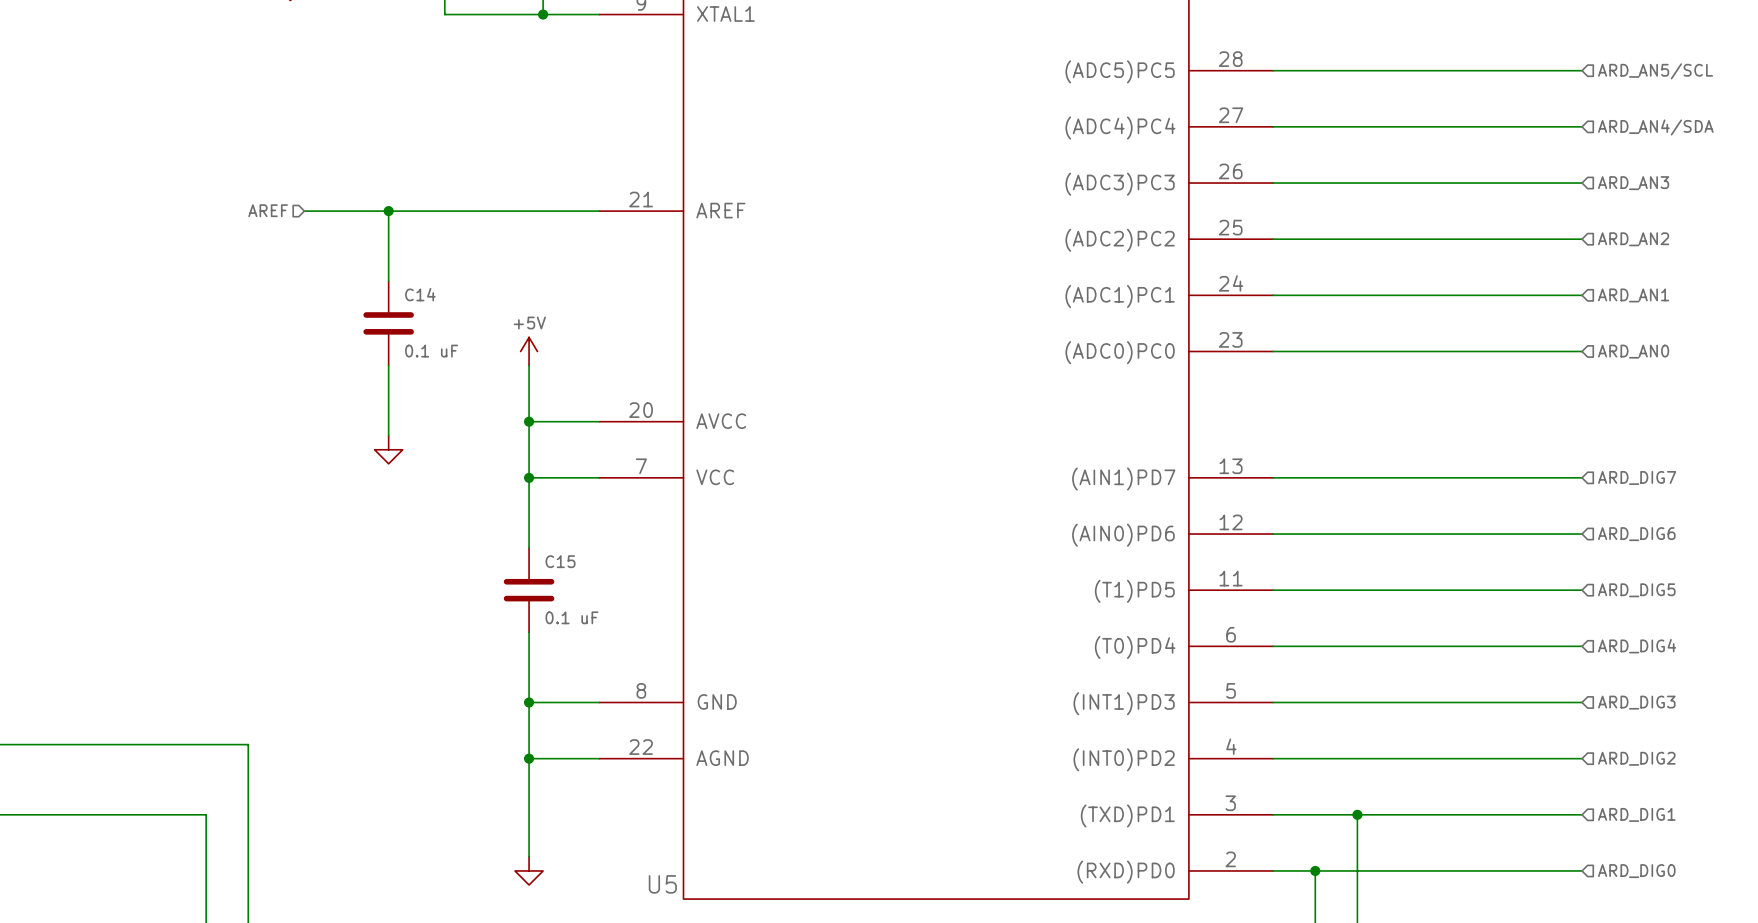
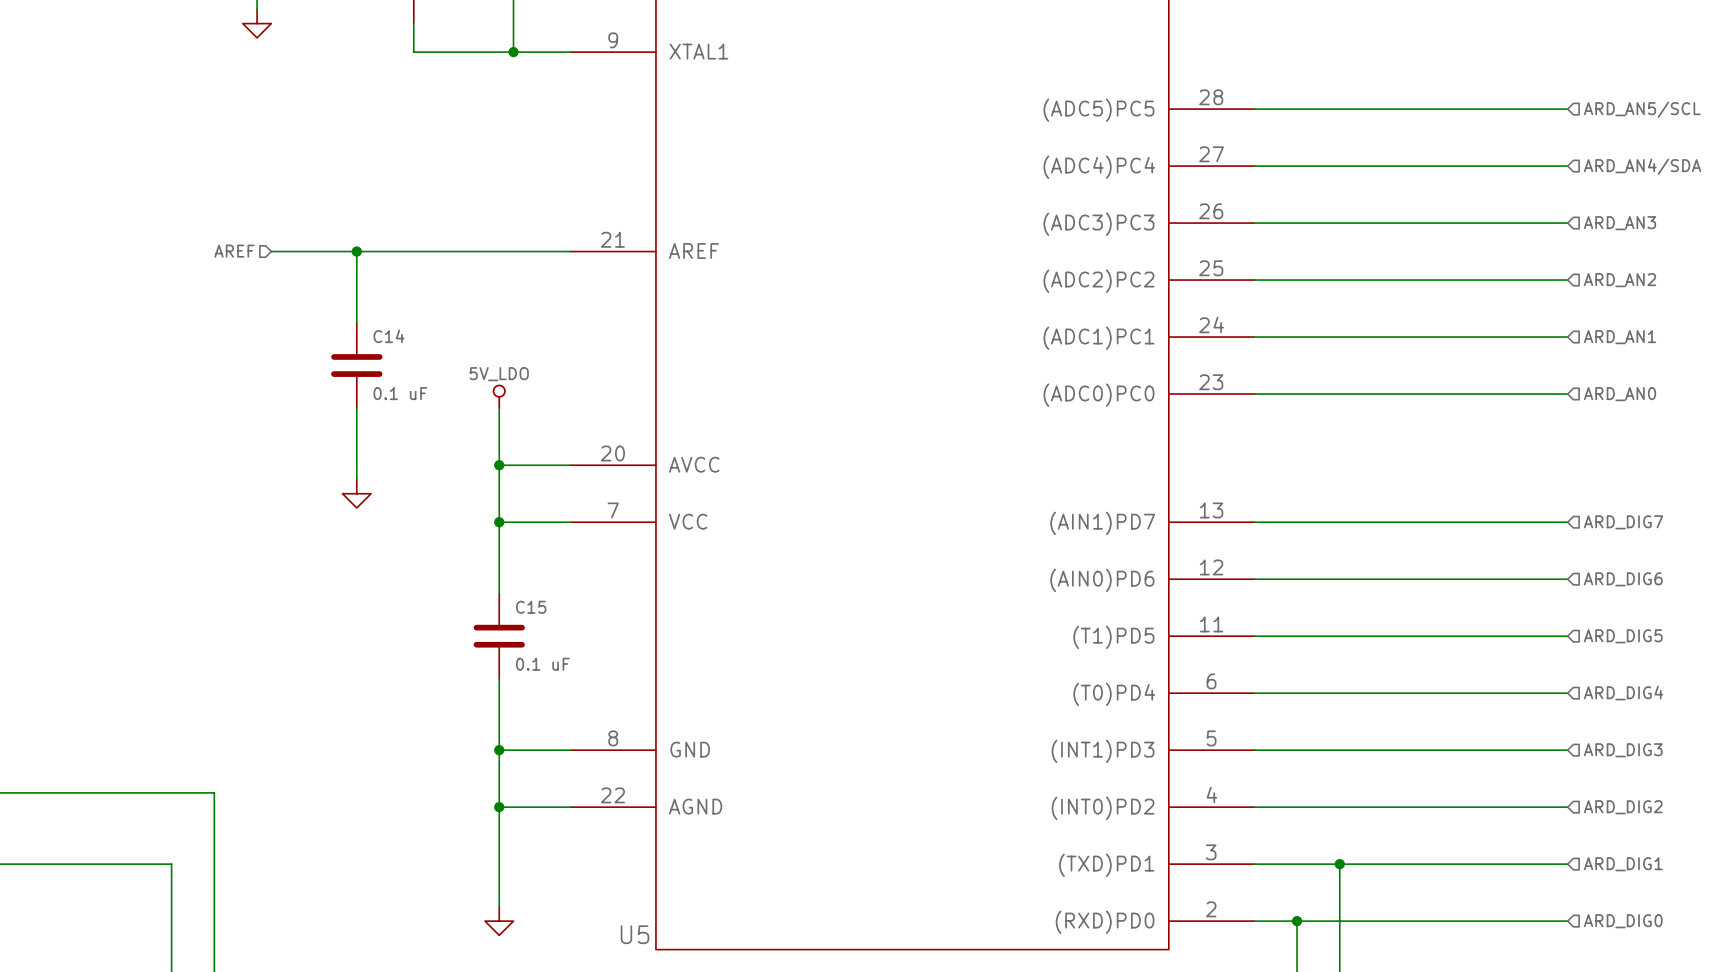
power symbol: +5V (529, 351) -> 5V_LDO (499, 396)

